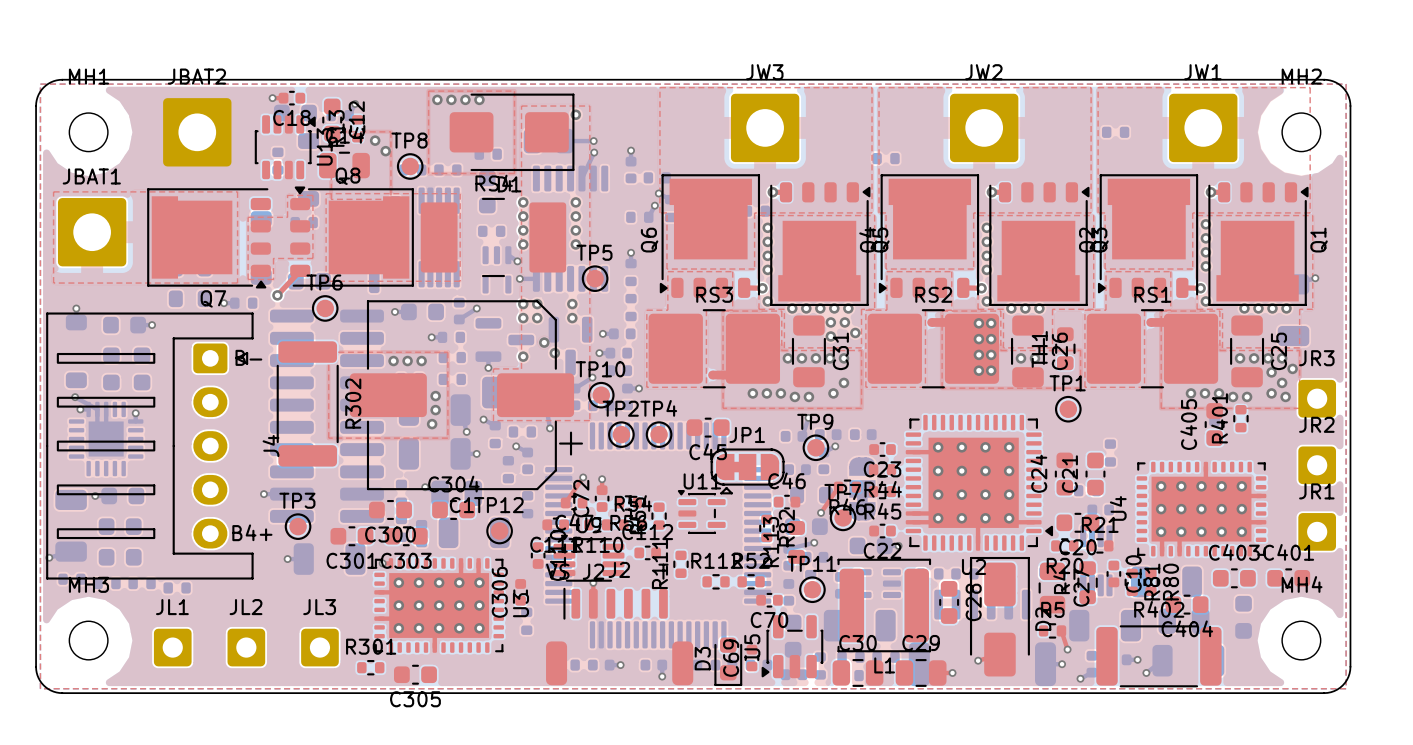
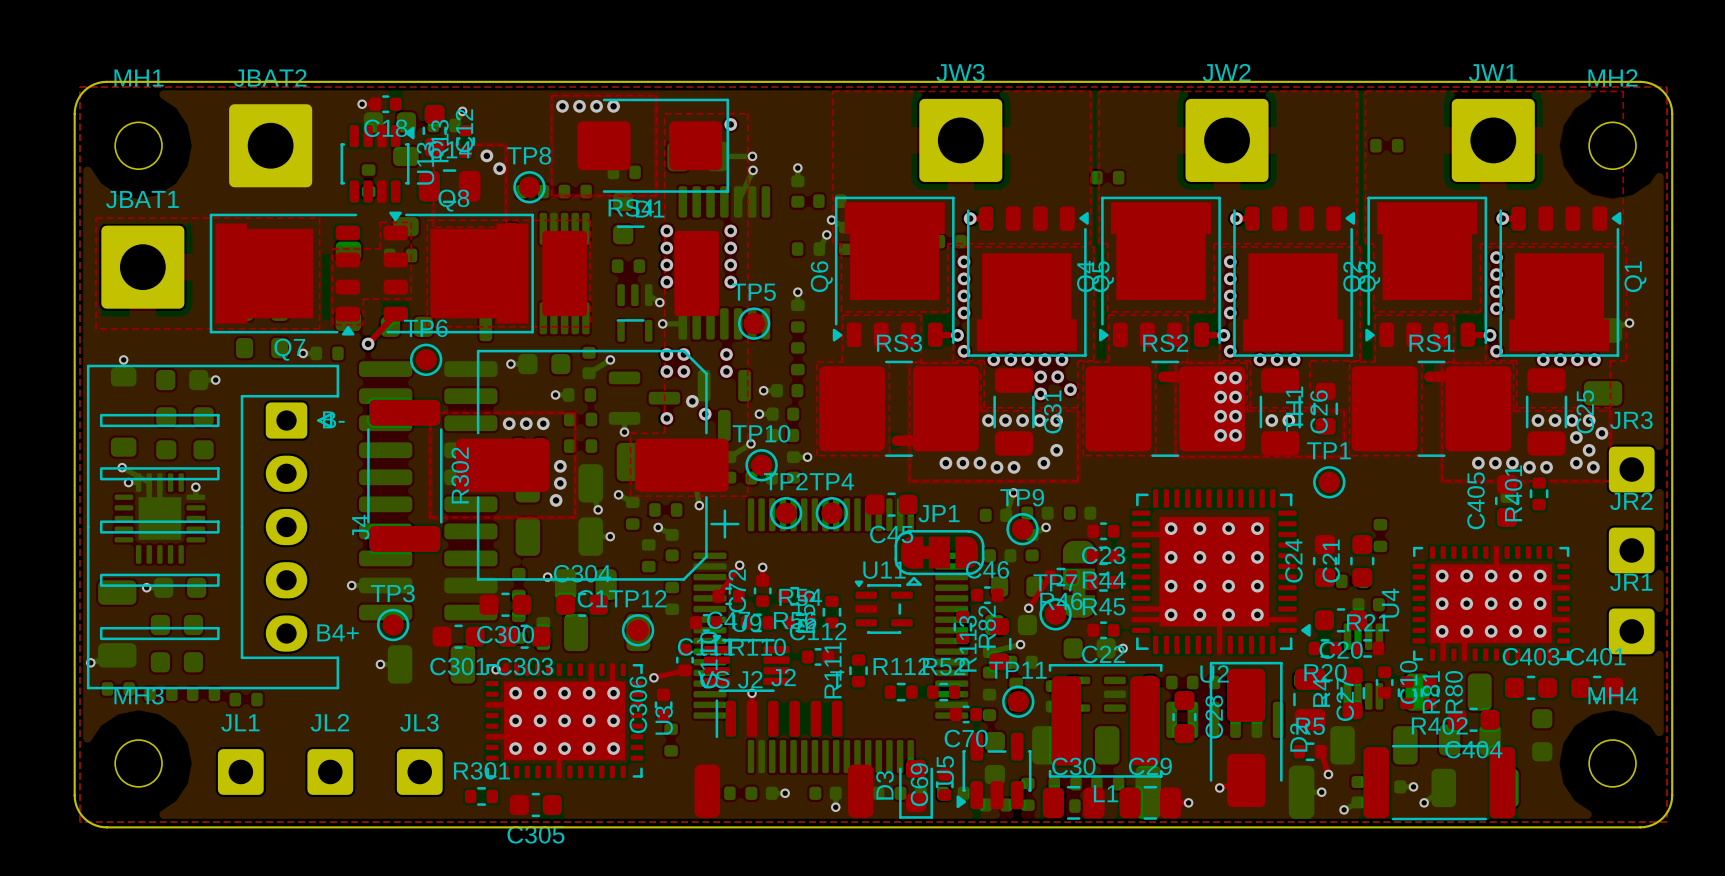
top track: none -> (684, 670) (653, 677)
via: none -> (653, 677)

